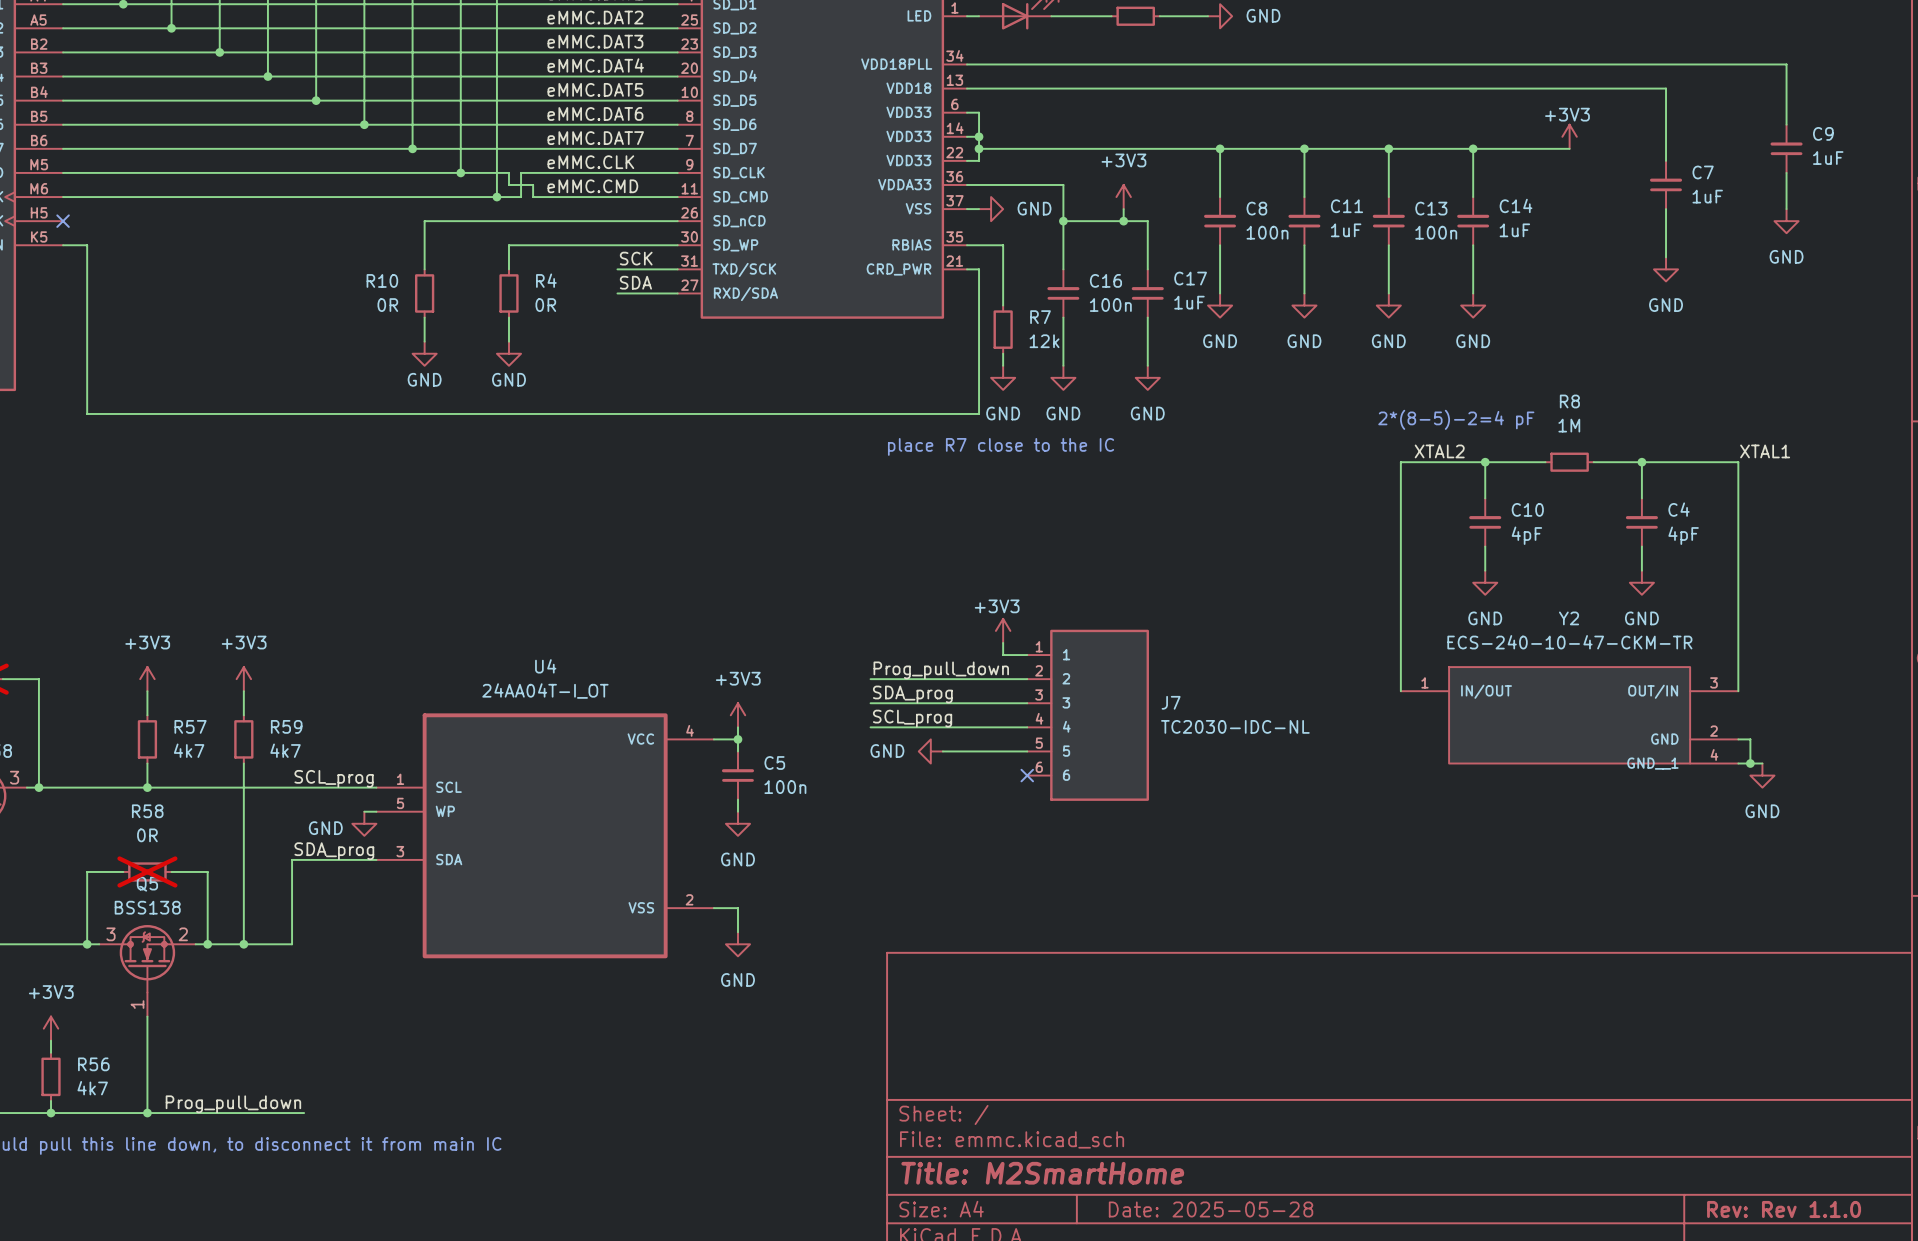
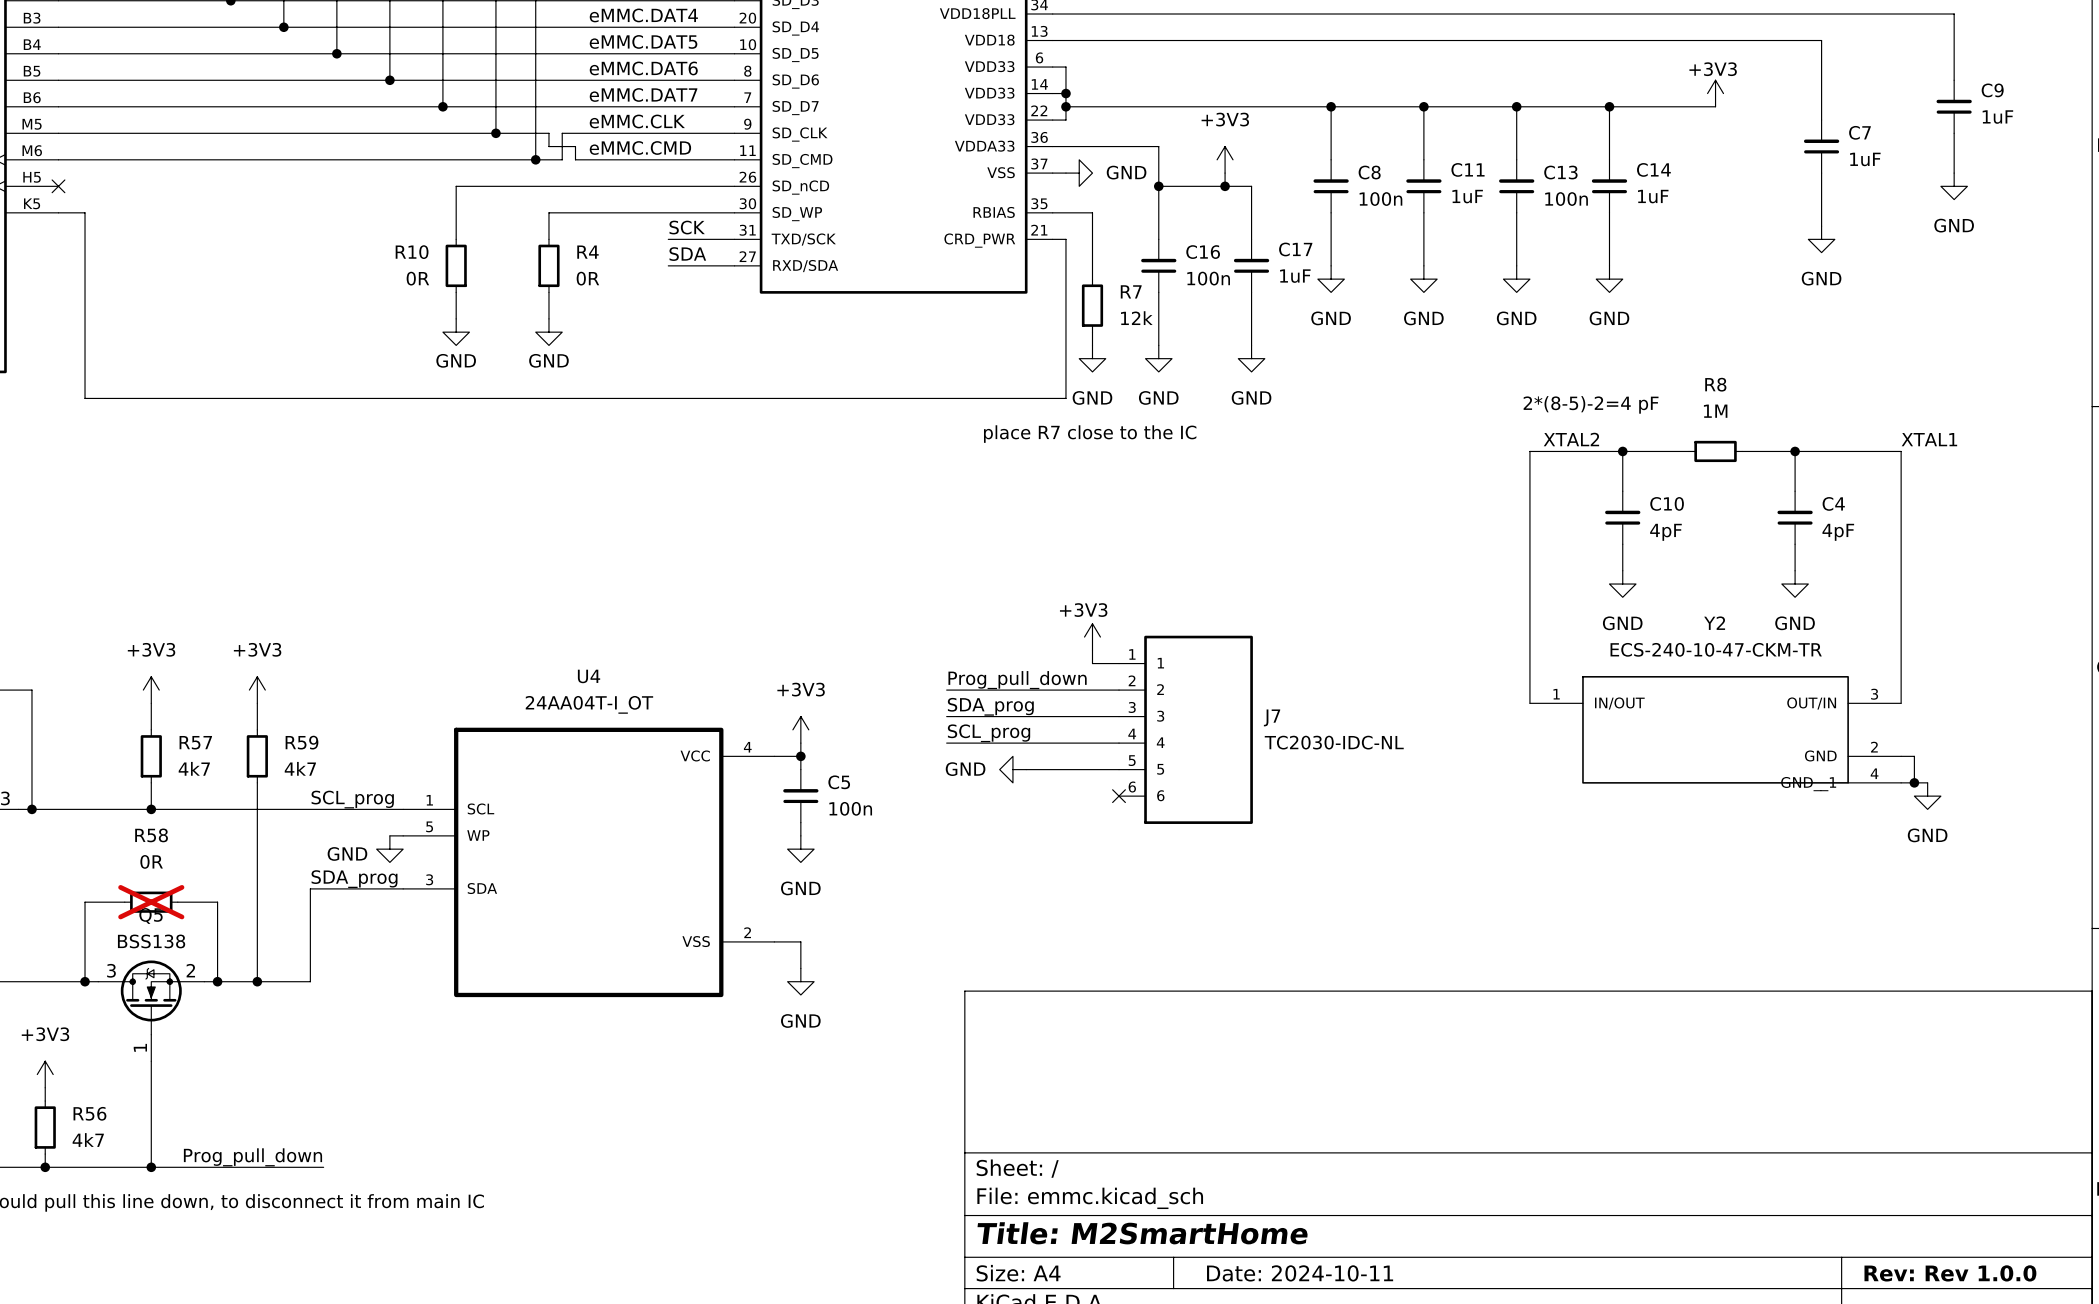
title block: Date: 2025-05-28 (1211, 1209) -> Date: 2024-10-11 (1300, 1273)
title block: Rev: Rev 1.1.0 (1784, 1209) -> Rev: Rev 1.0.0 (1950, 1273)

